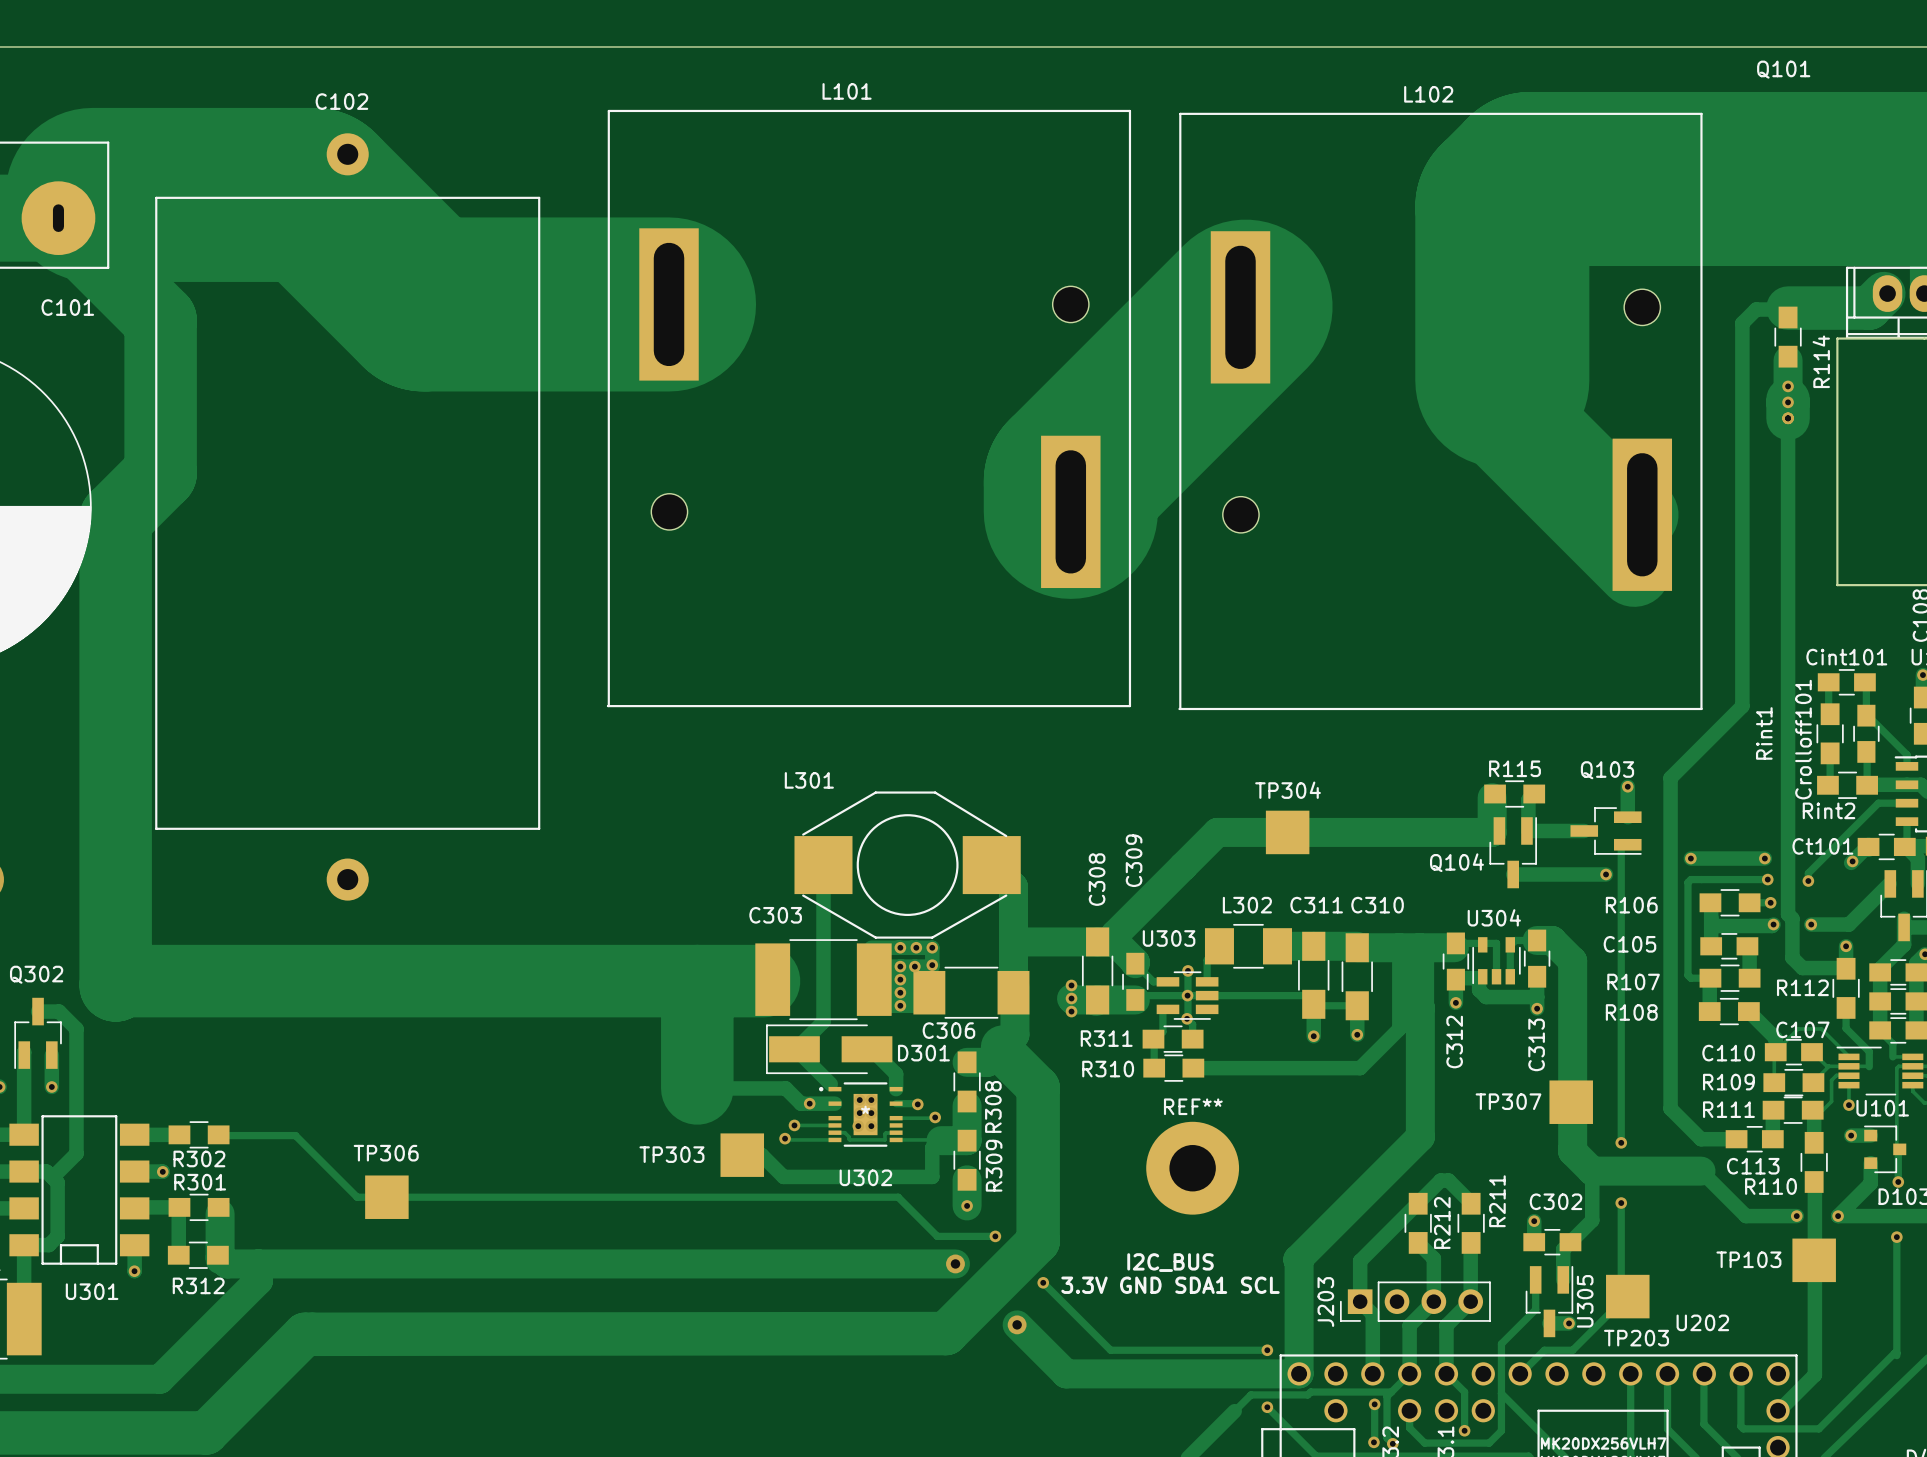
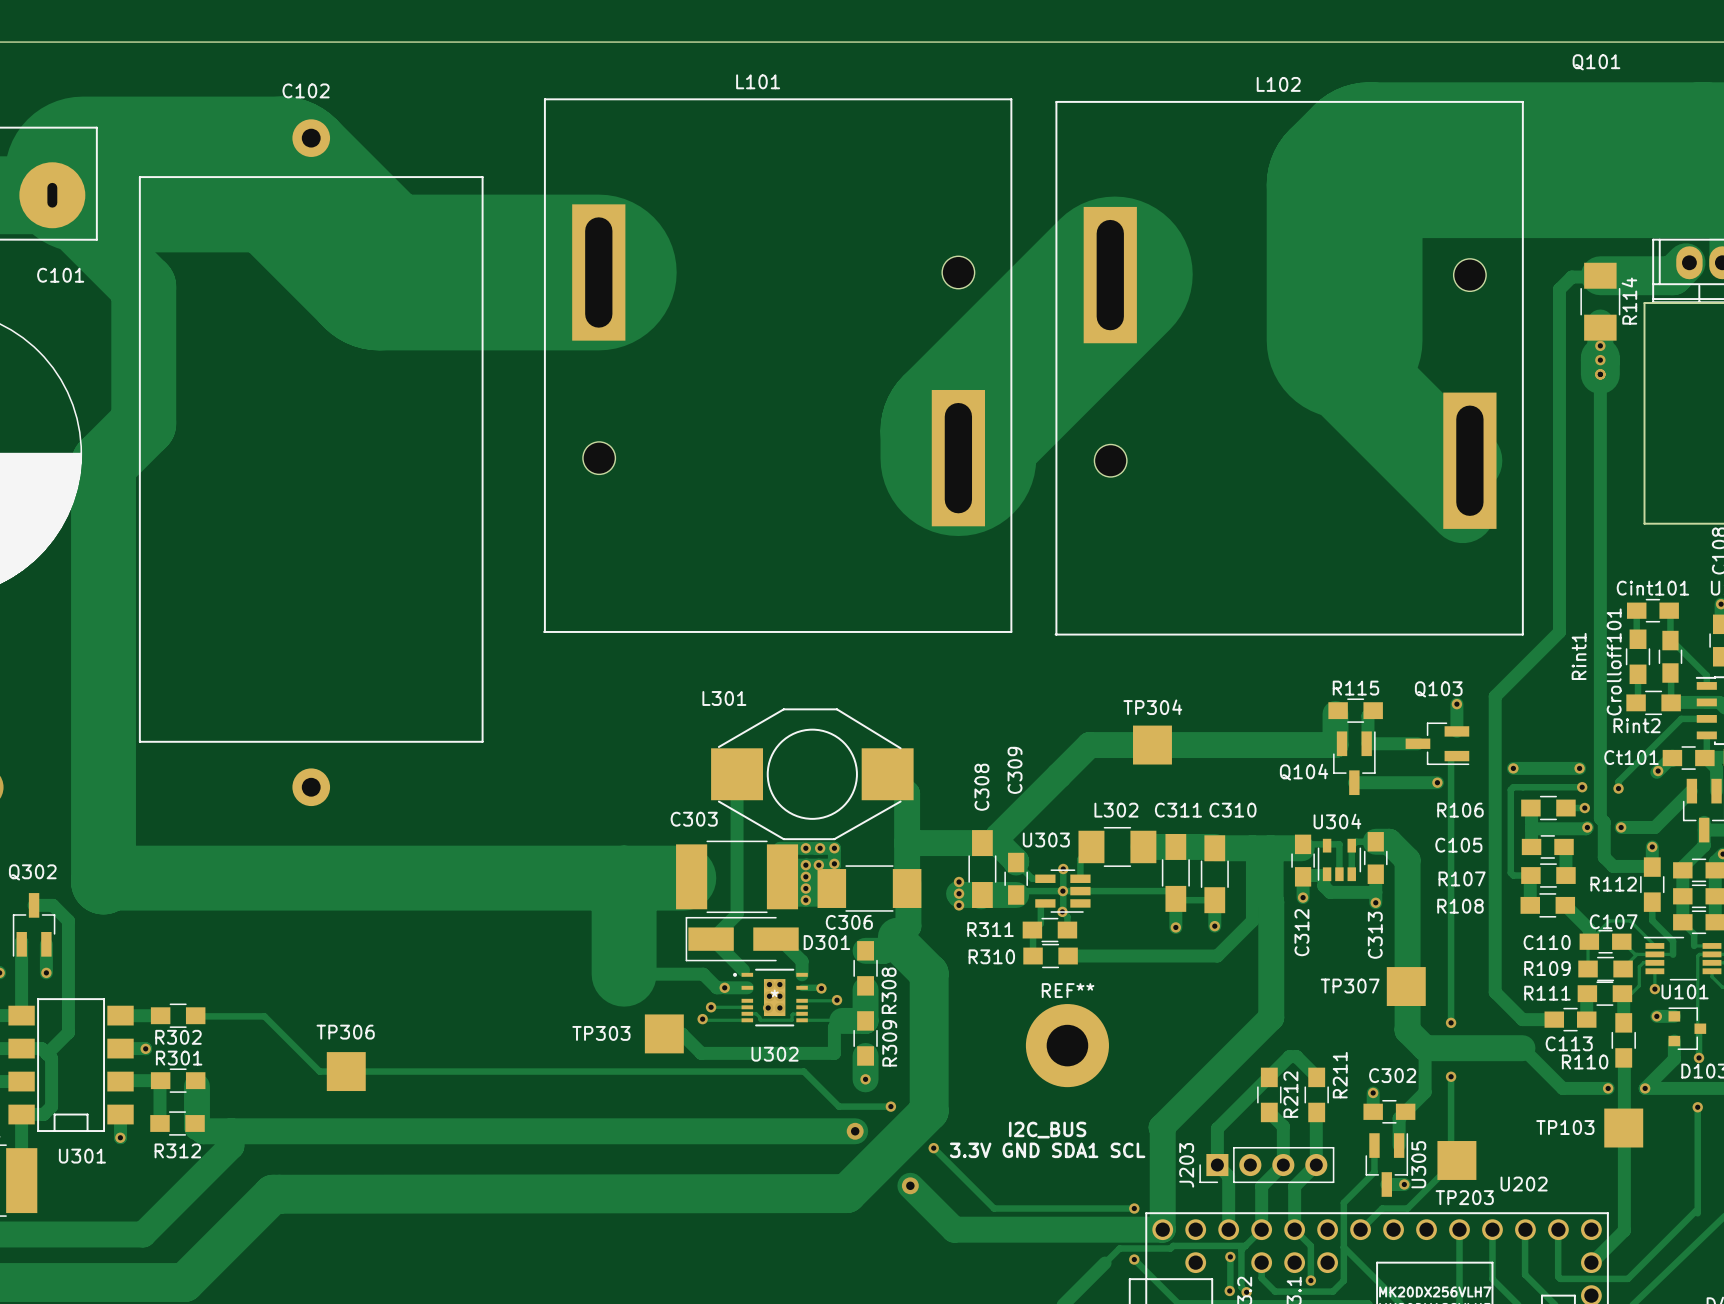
R114 footprint: [1774, 306, 1802, 368] -> [1580, 262, 1621, 341]

